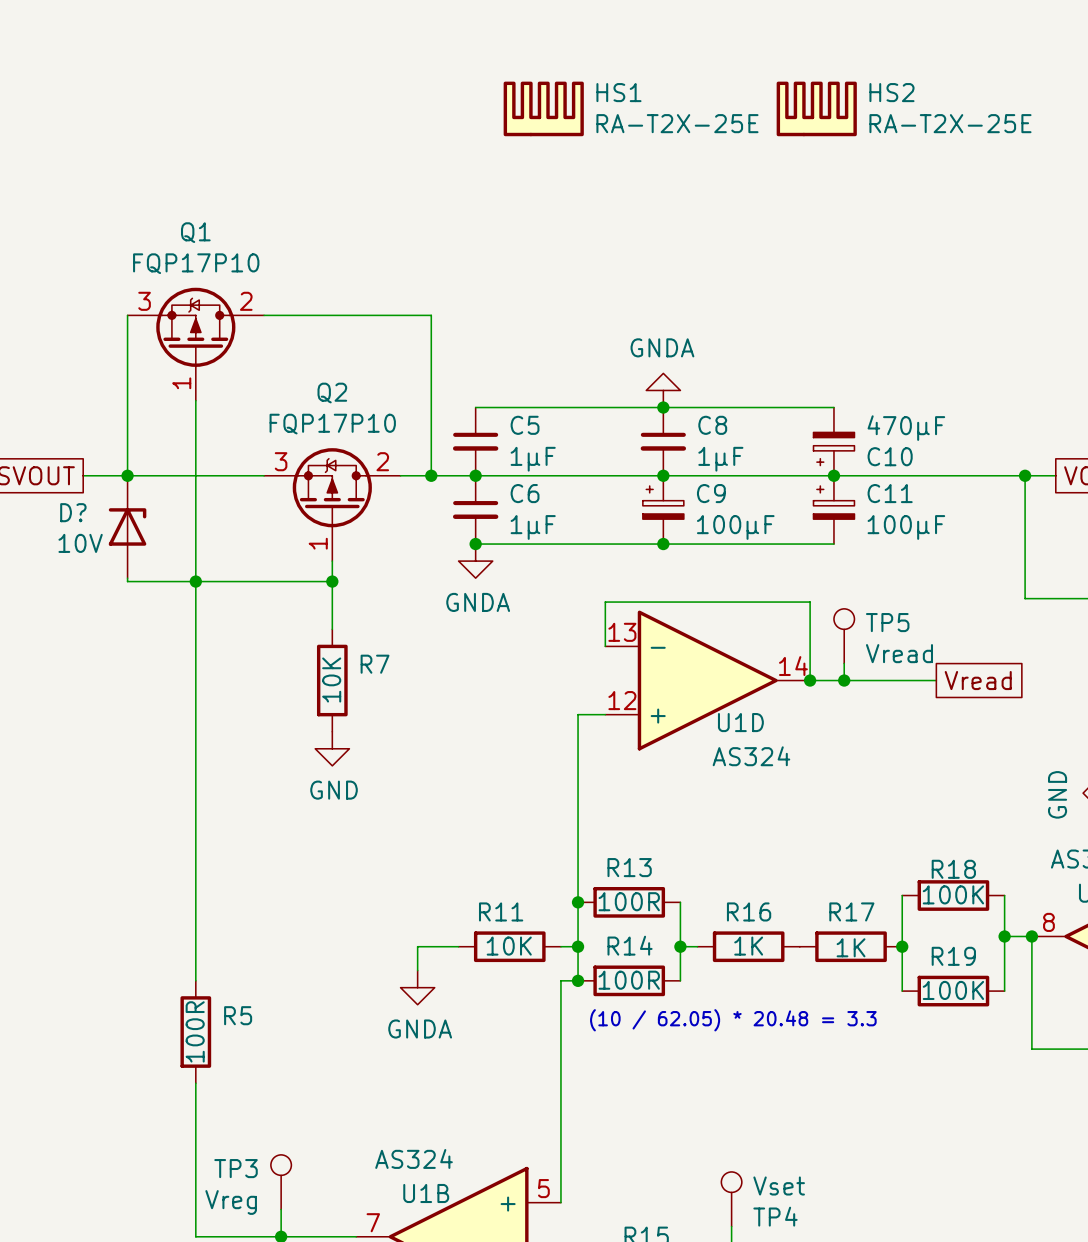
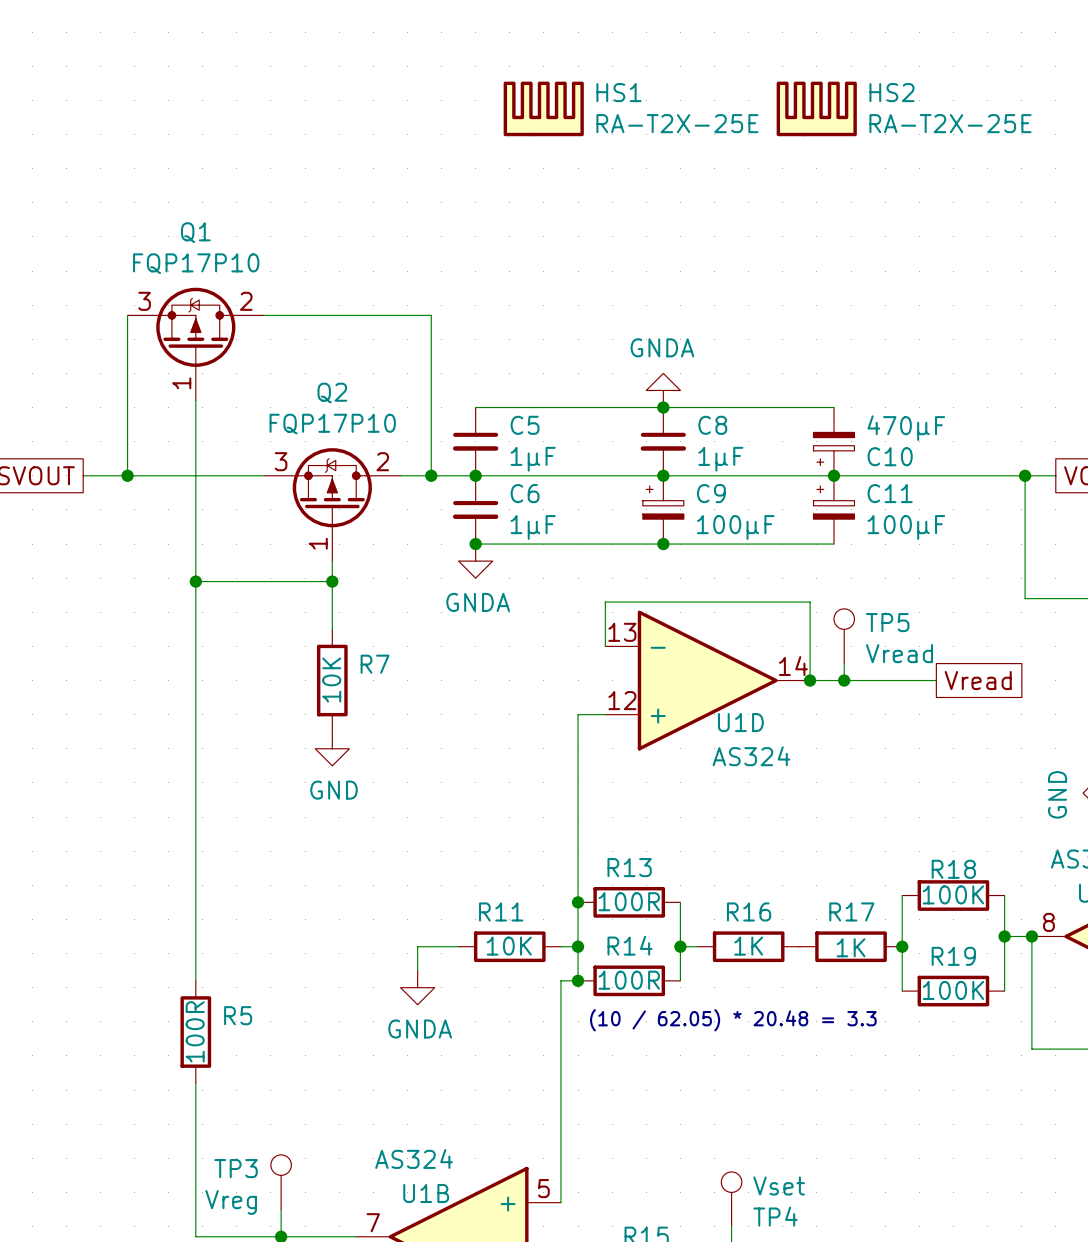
D?: 10V (127, 526) -> none
wire: (127, 578) (127, 581) (195, 581) -> none

